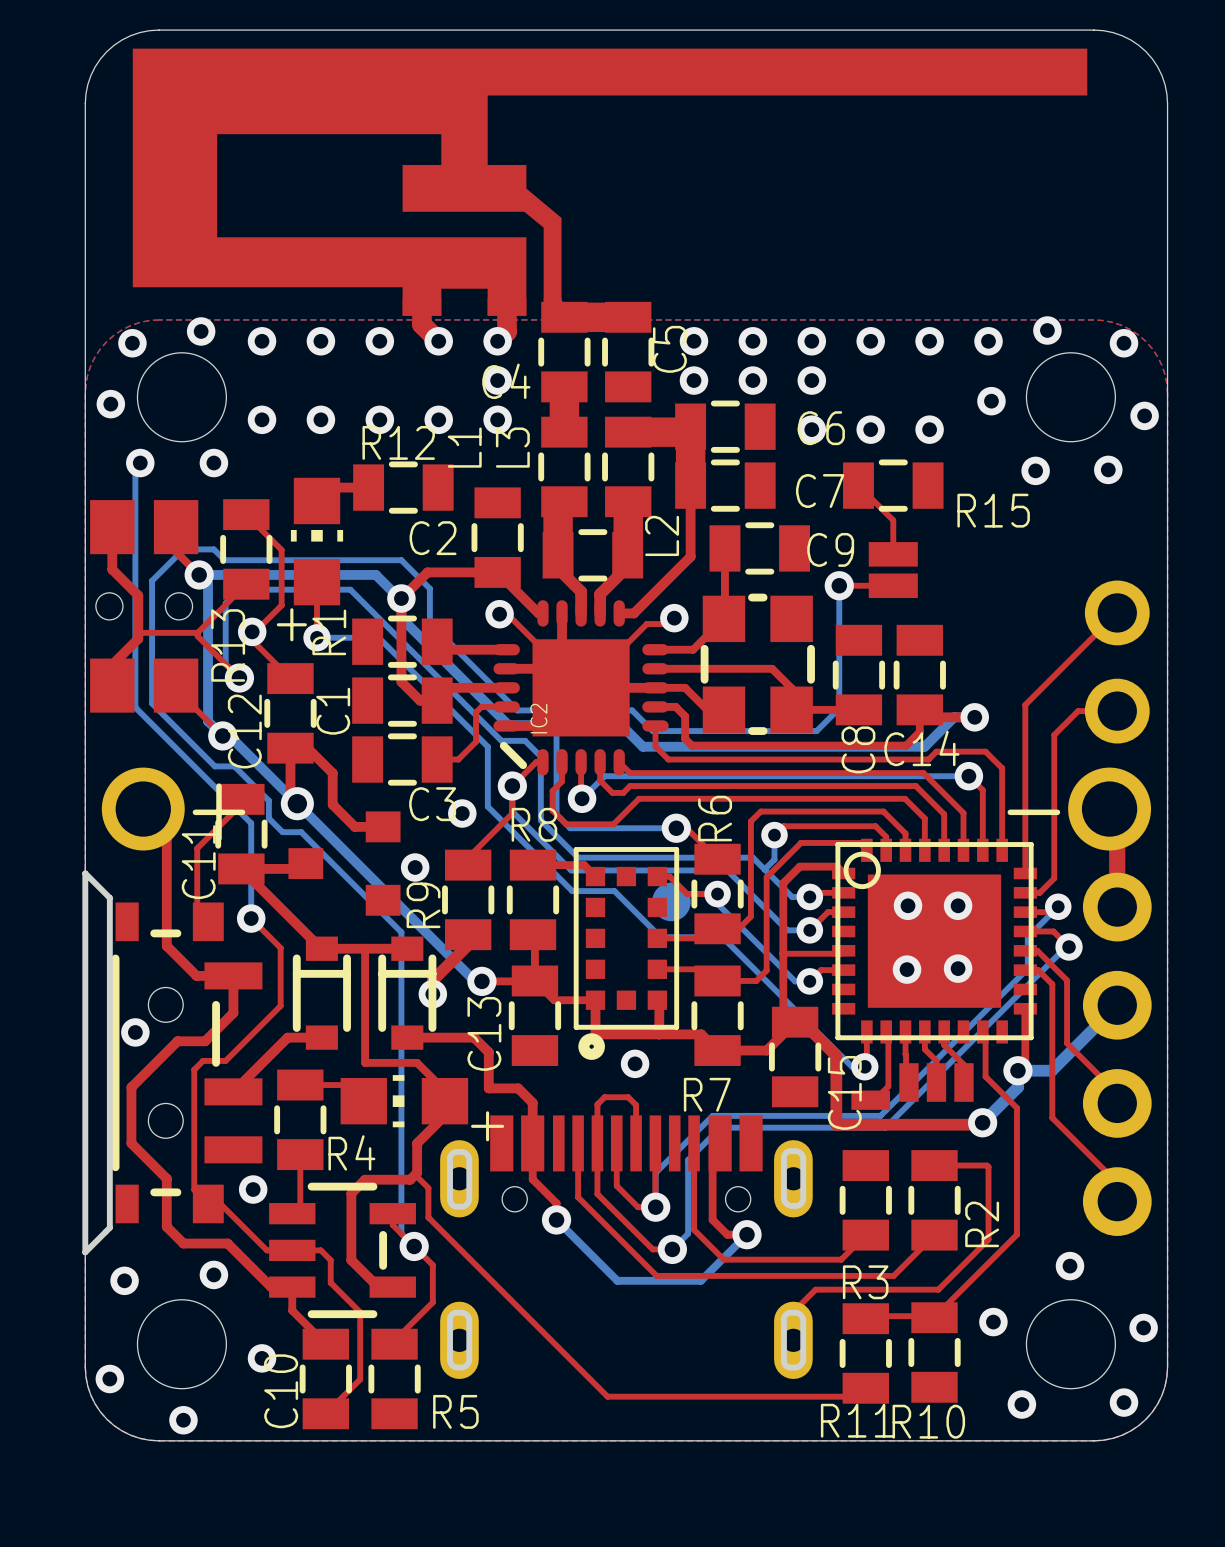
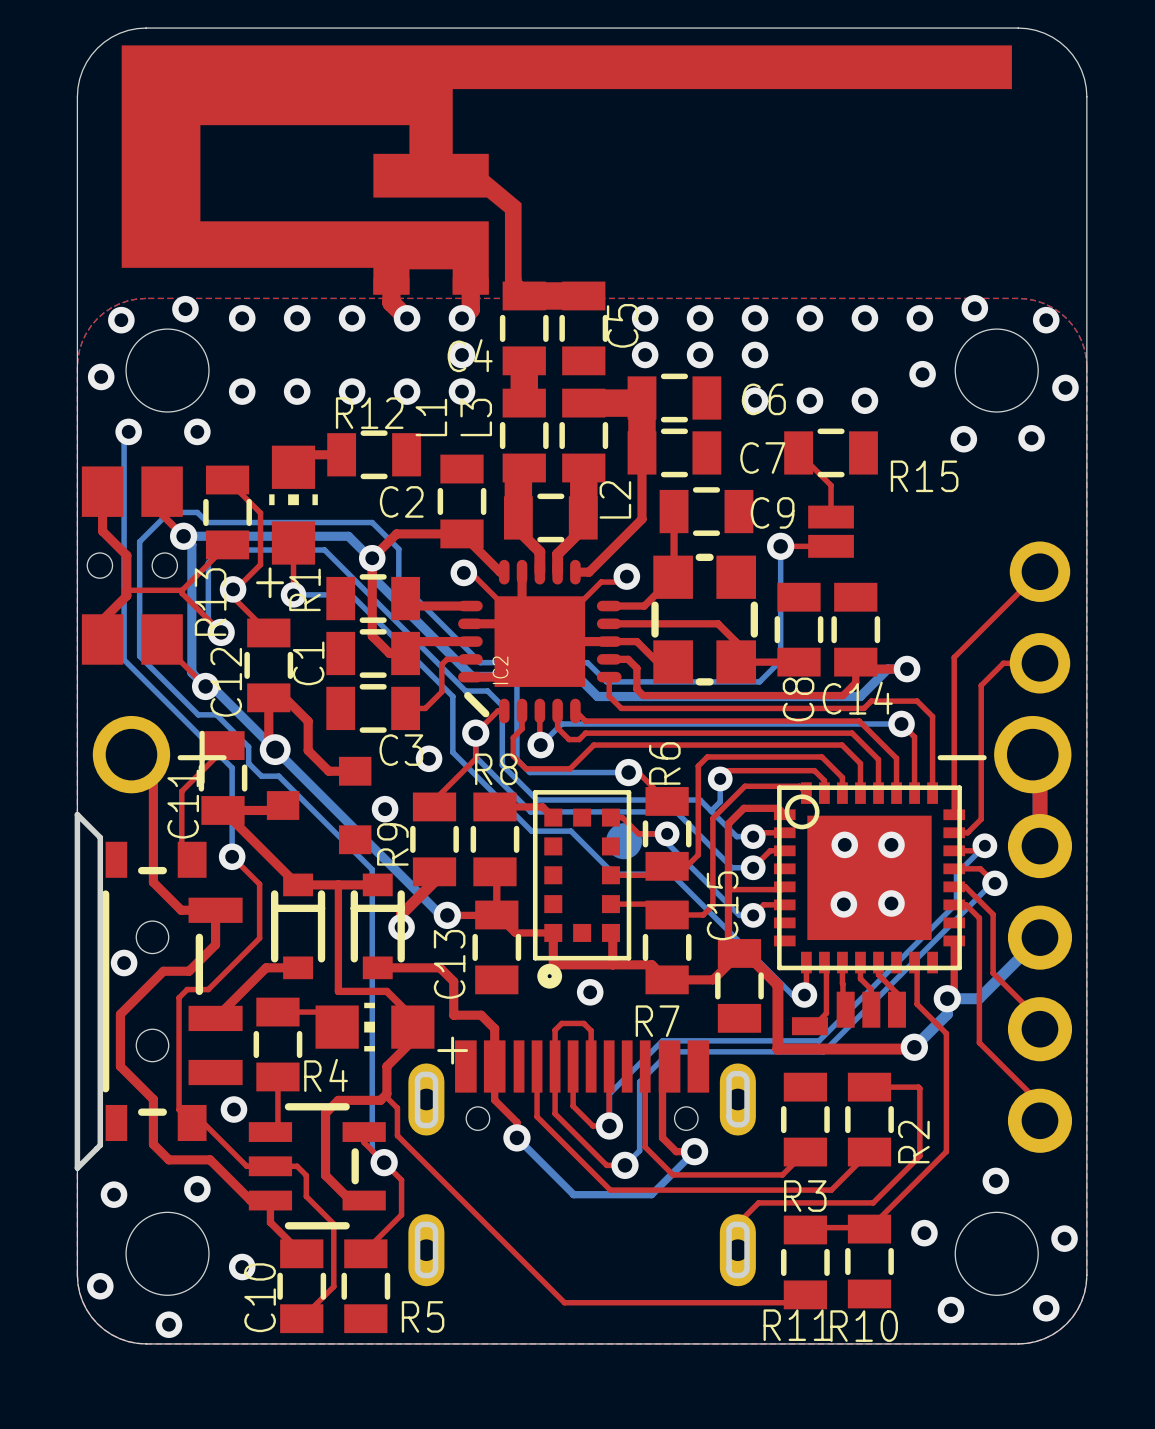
C15 name position: C15 (844, 1092) -> C15 (722, 905)

